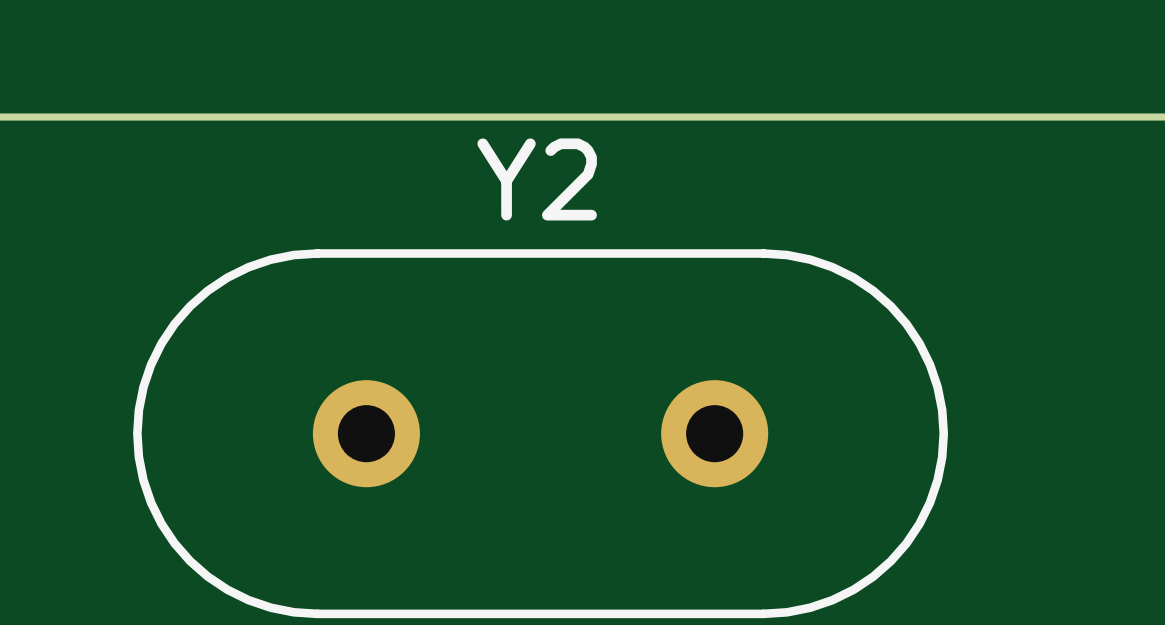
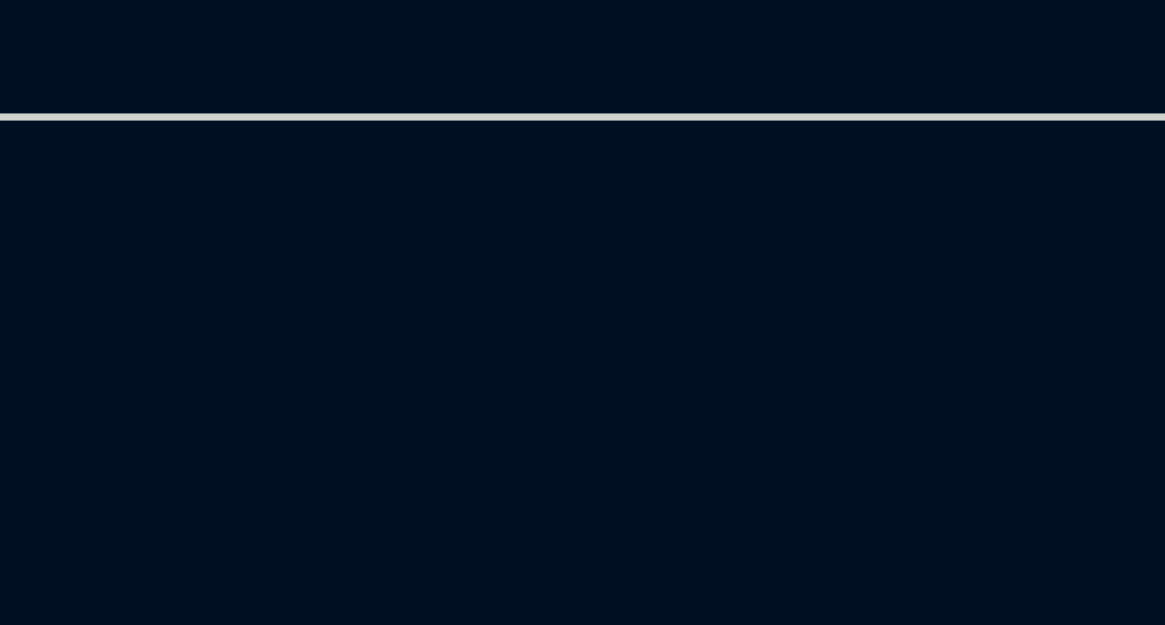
Y2: (540, 433) -> none

